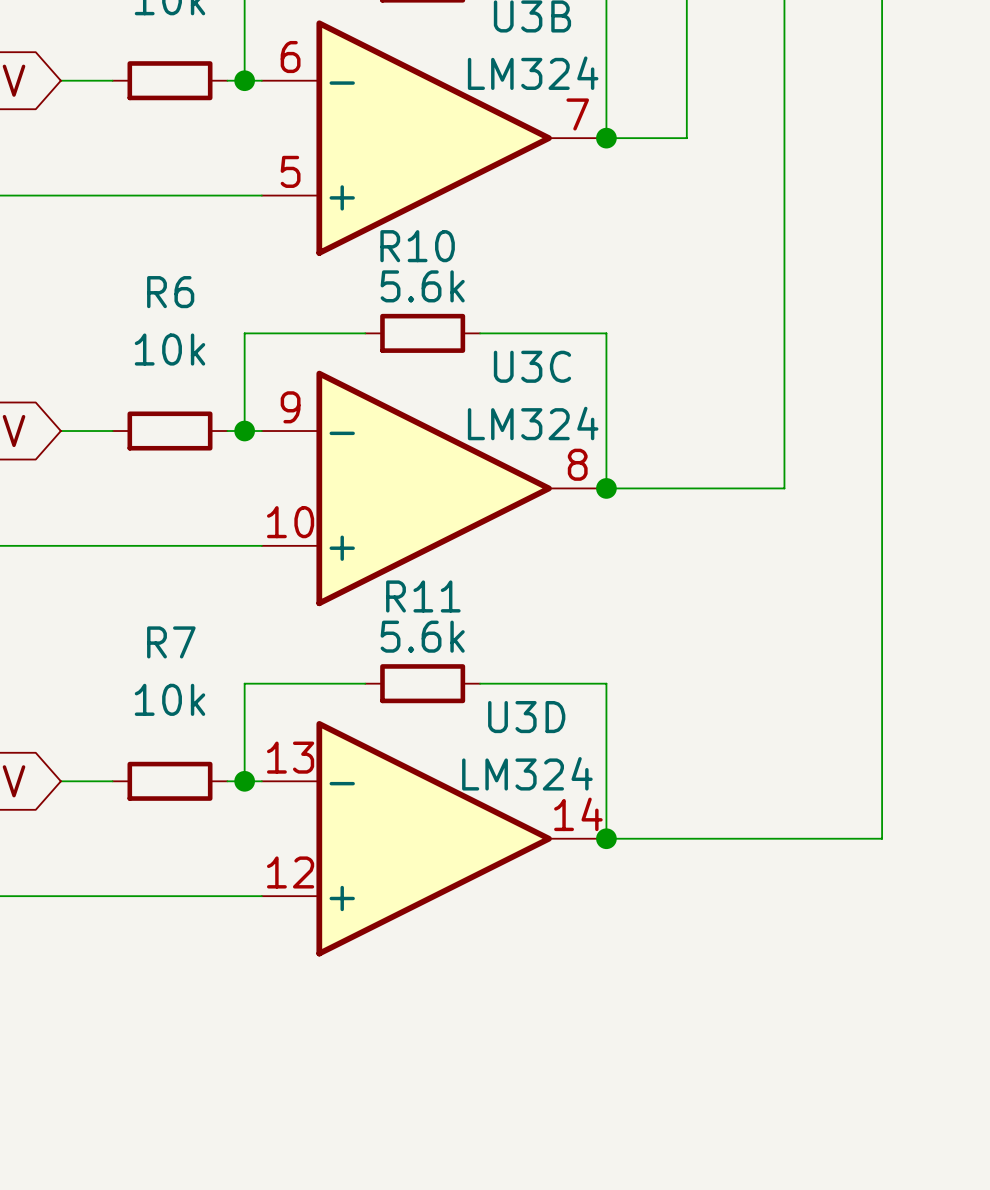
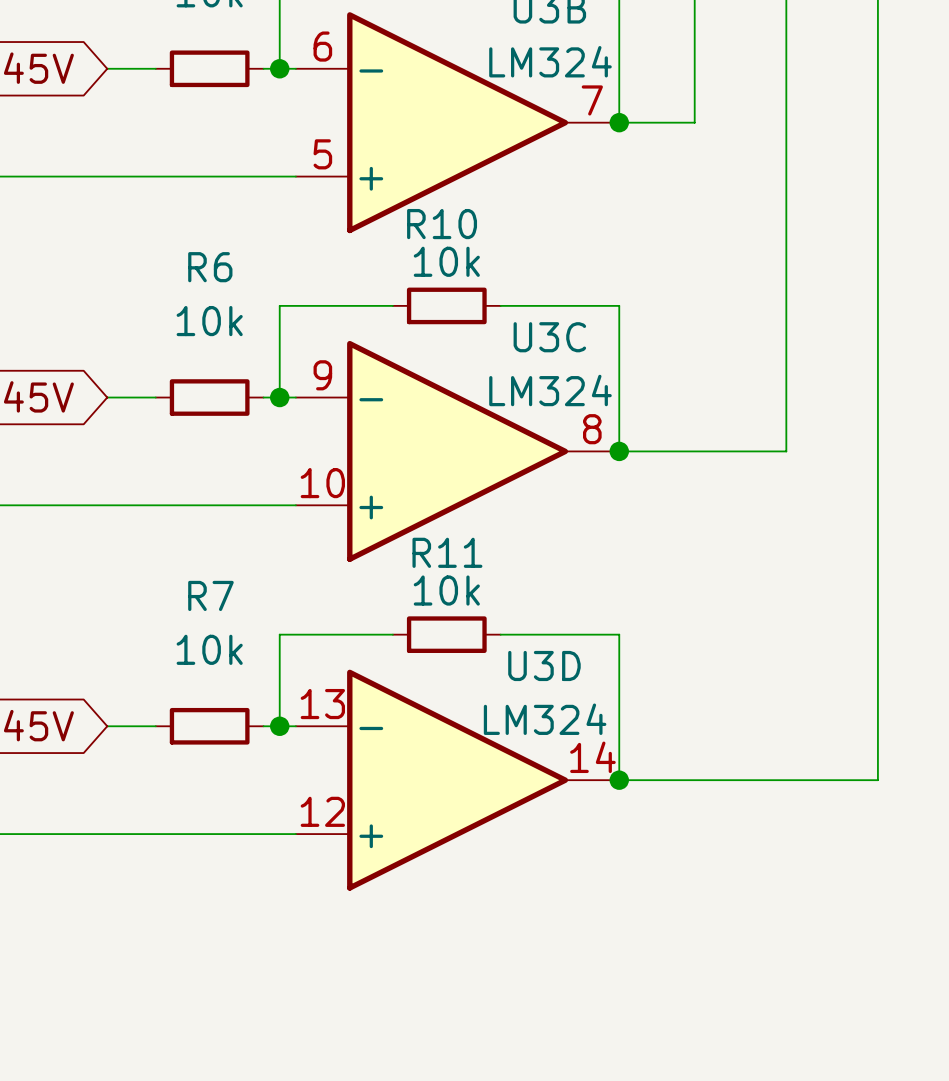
R10 value: 5.6k (422, 286) -> 10k (446, 261)
R11 value: 5.6k (422, 636) -> 10k (446, 590)

